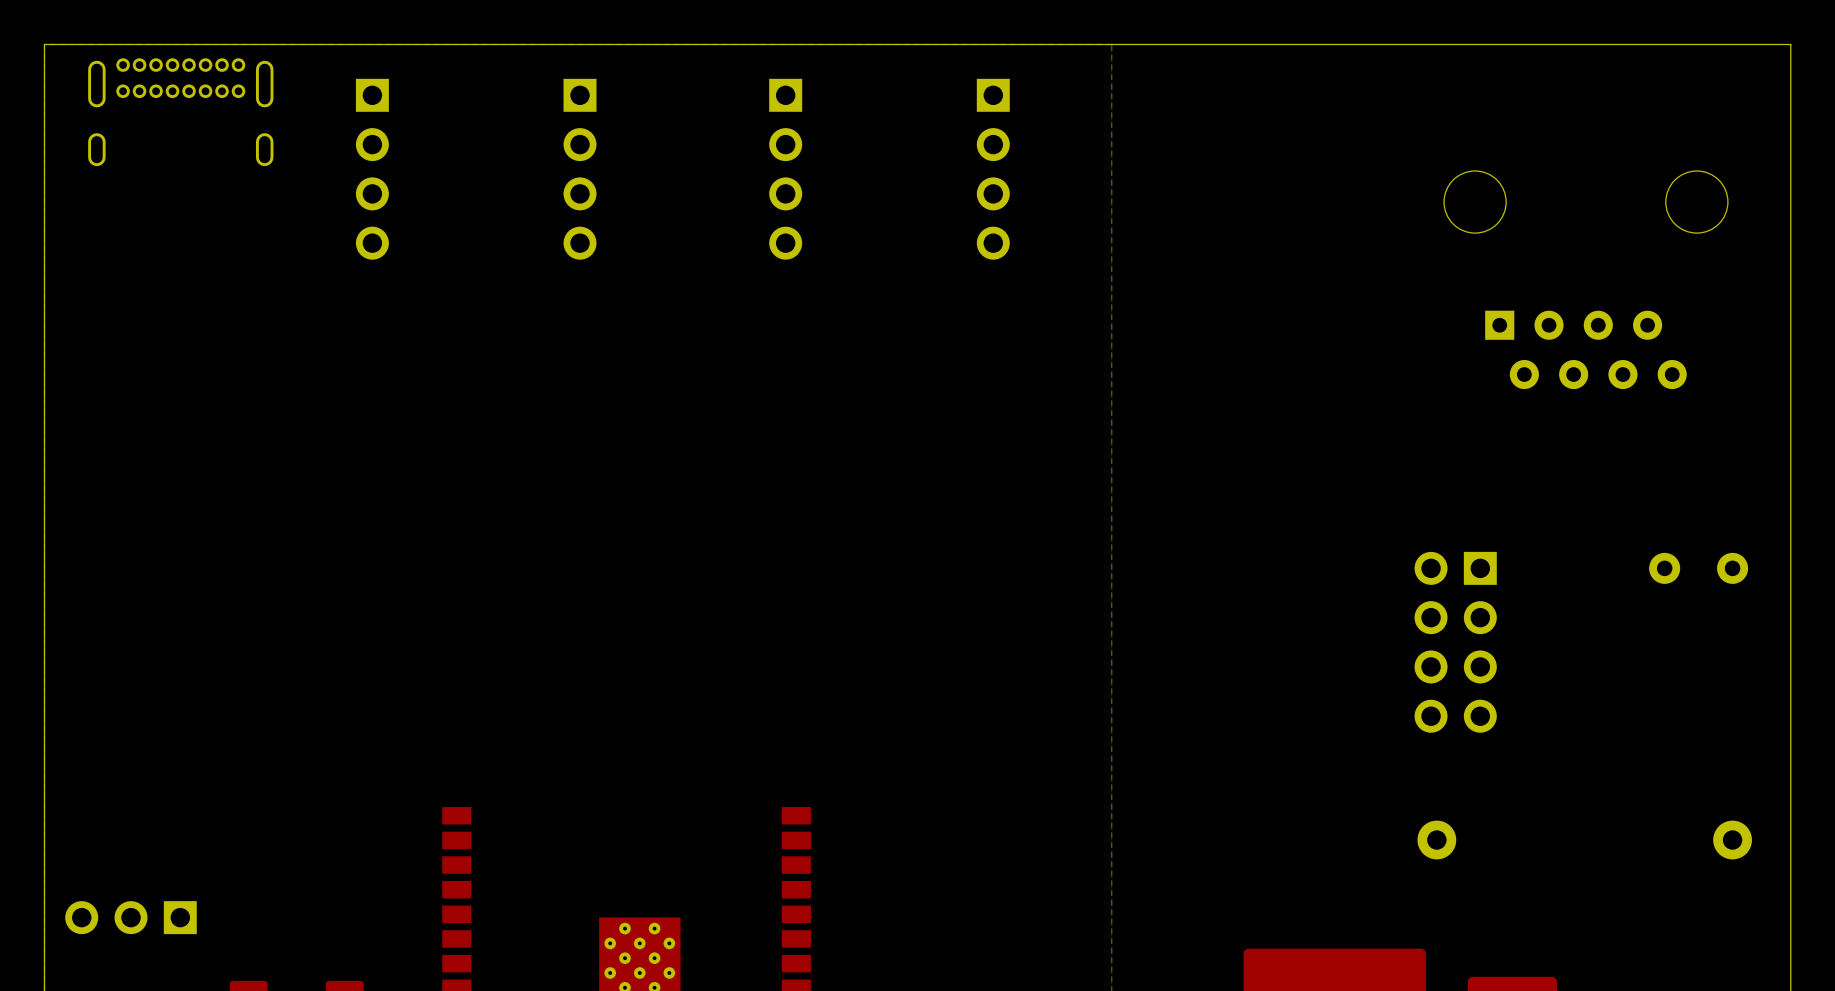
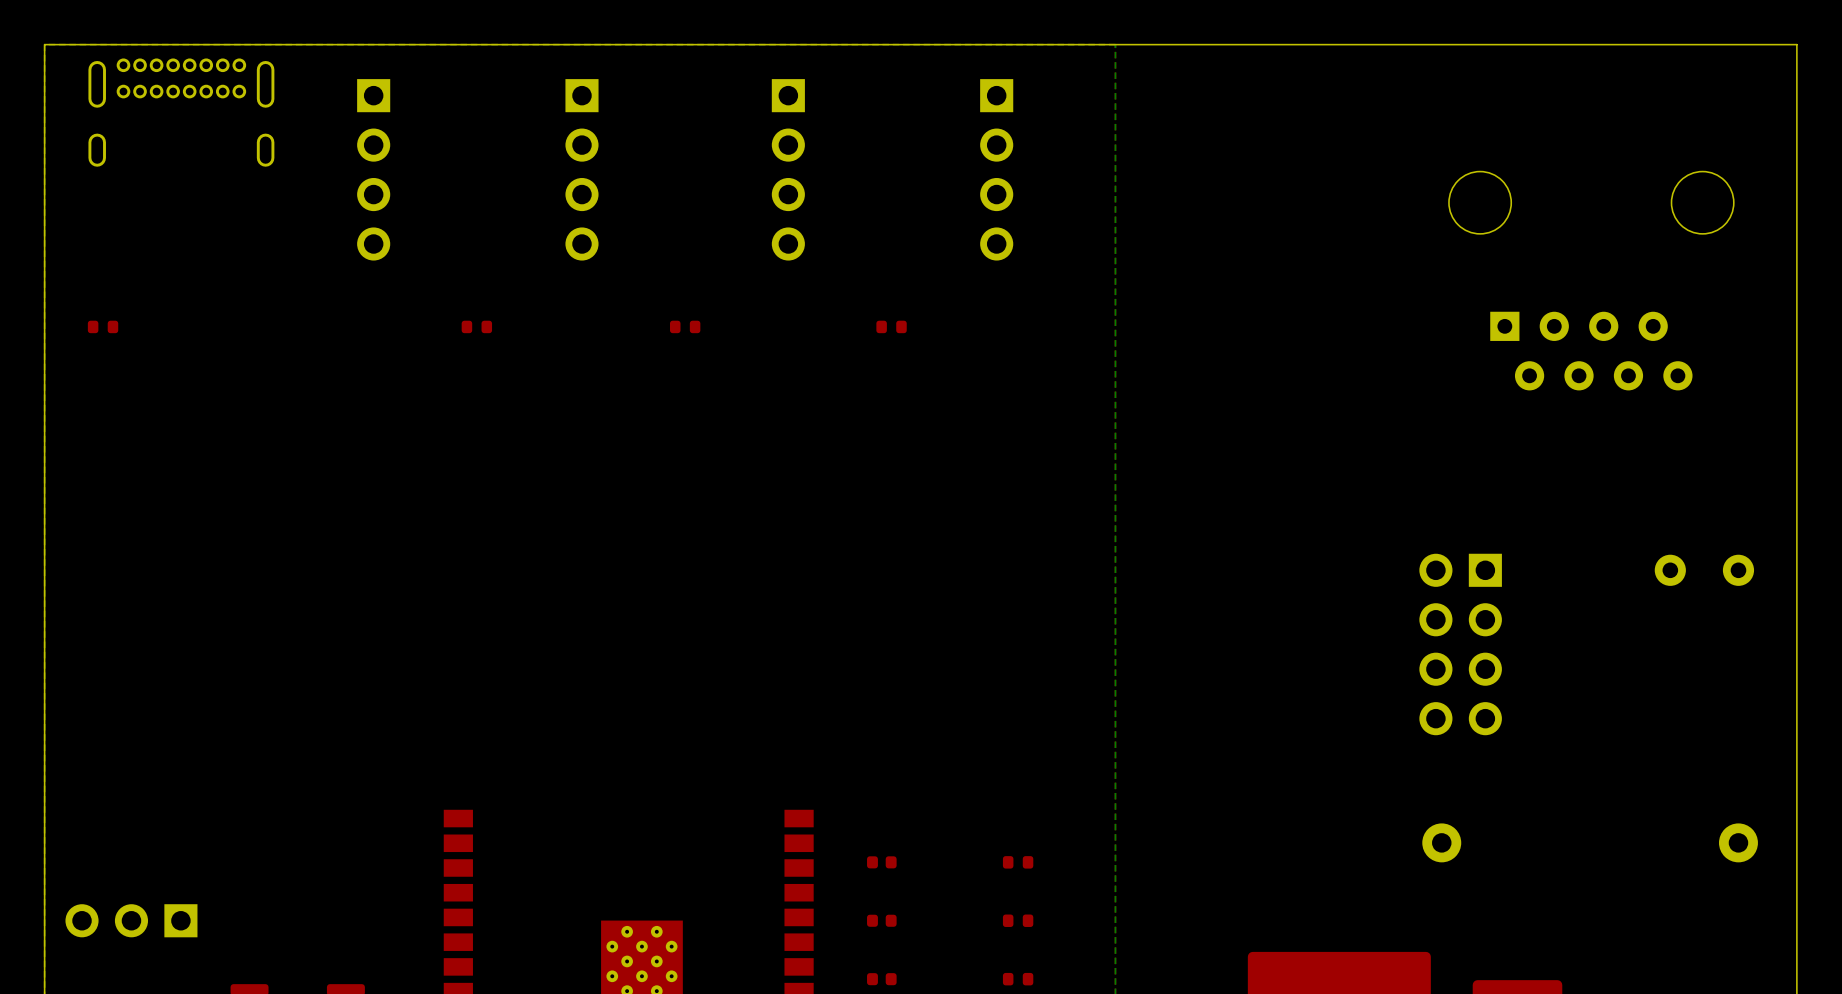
part: none -> (103, 326)
part: none -> (476, 326)
part: none -> (685, 326)
part: none -> (891, 326)
part: none -> (881, 862)
part: none -> (1018, 862)
part: none -> (881, 920)
part: none -> (1018, 920)
part: none -> (881, 979)
part: none -> (1018, 979)

